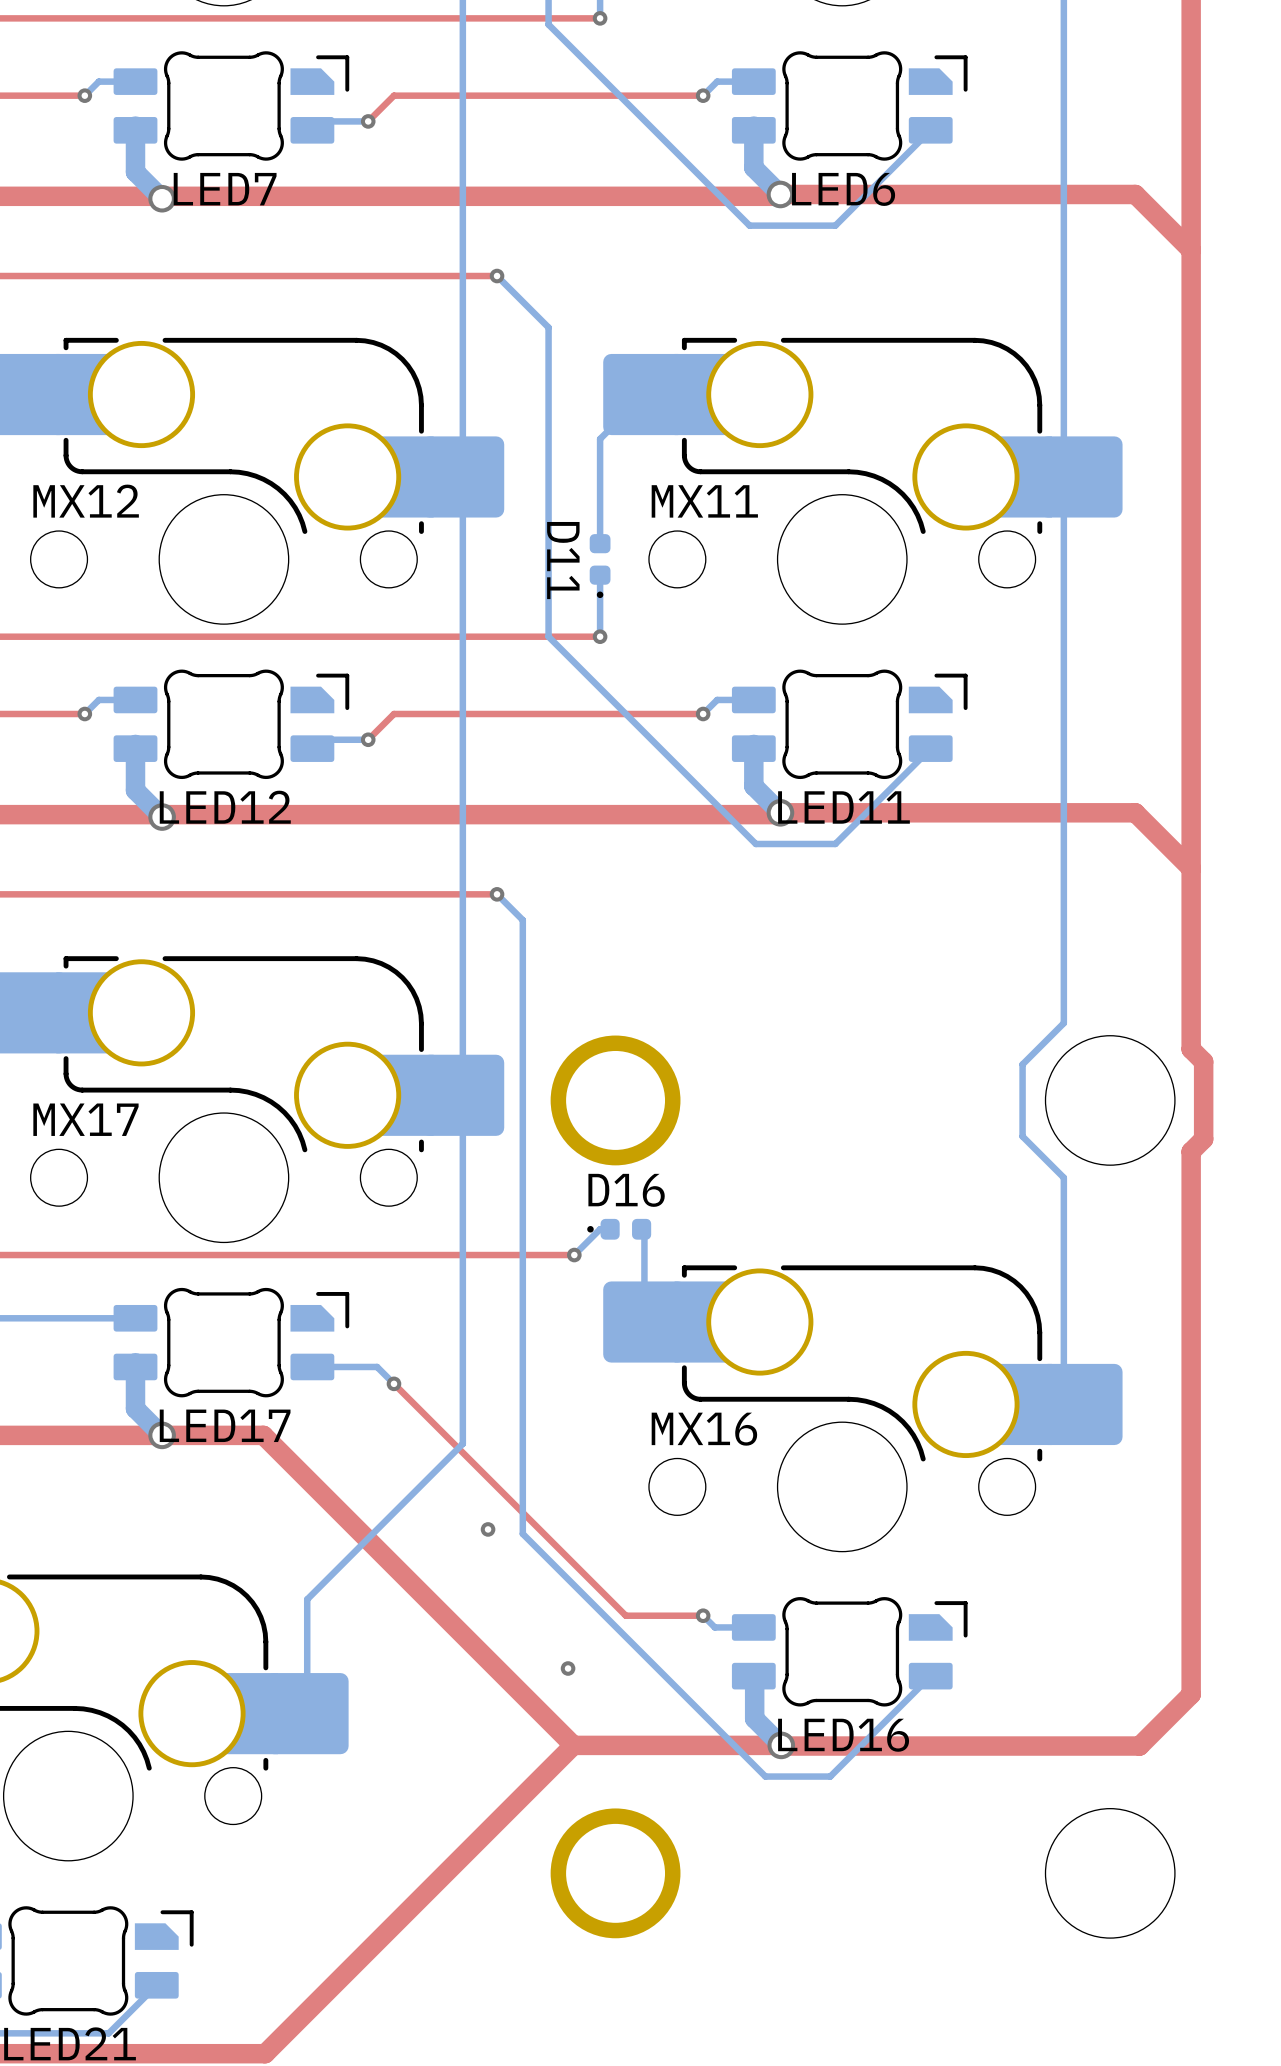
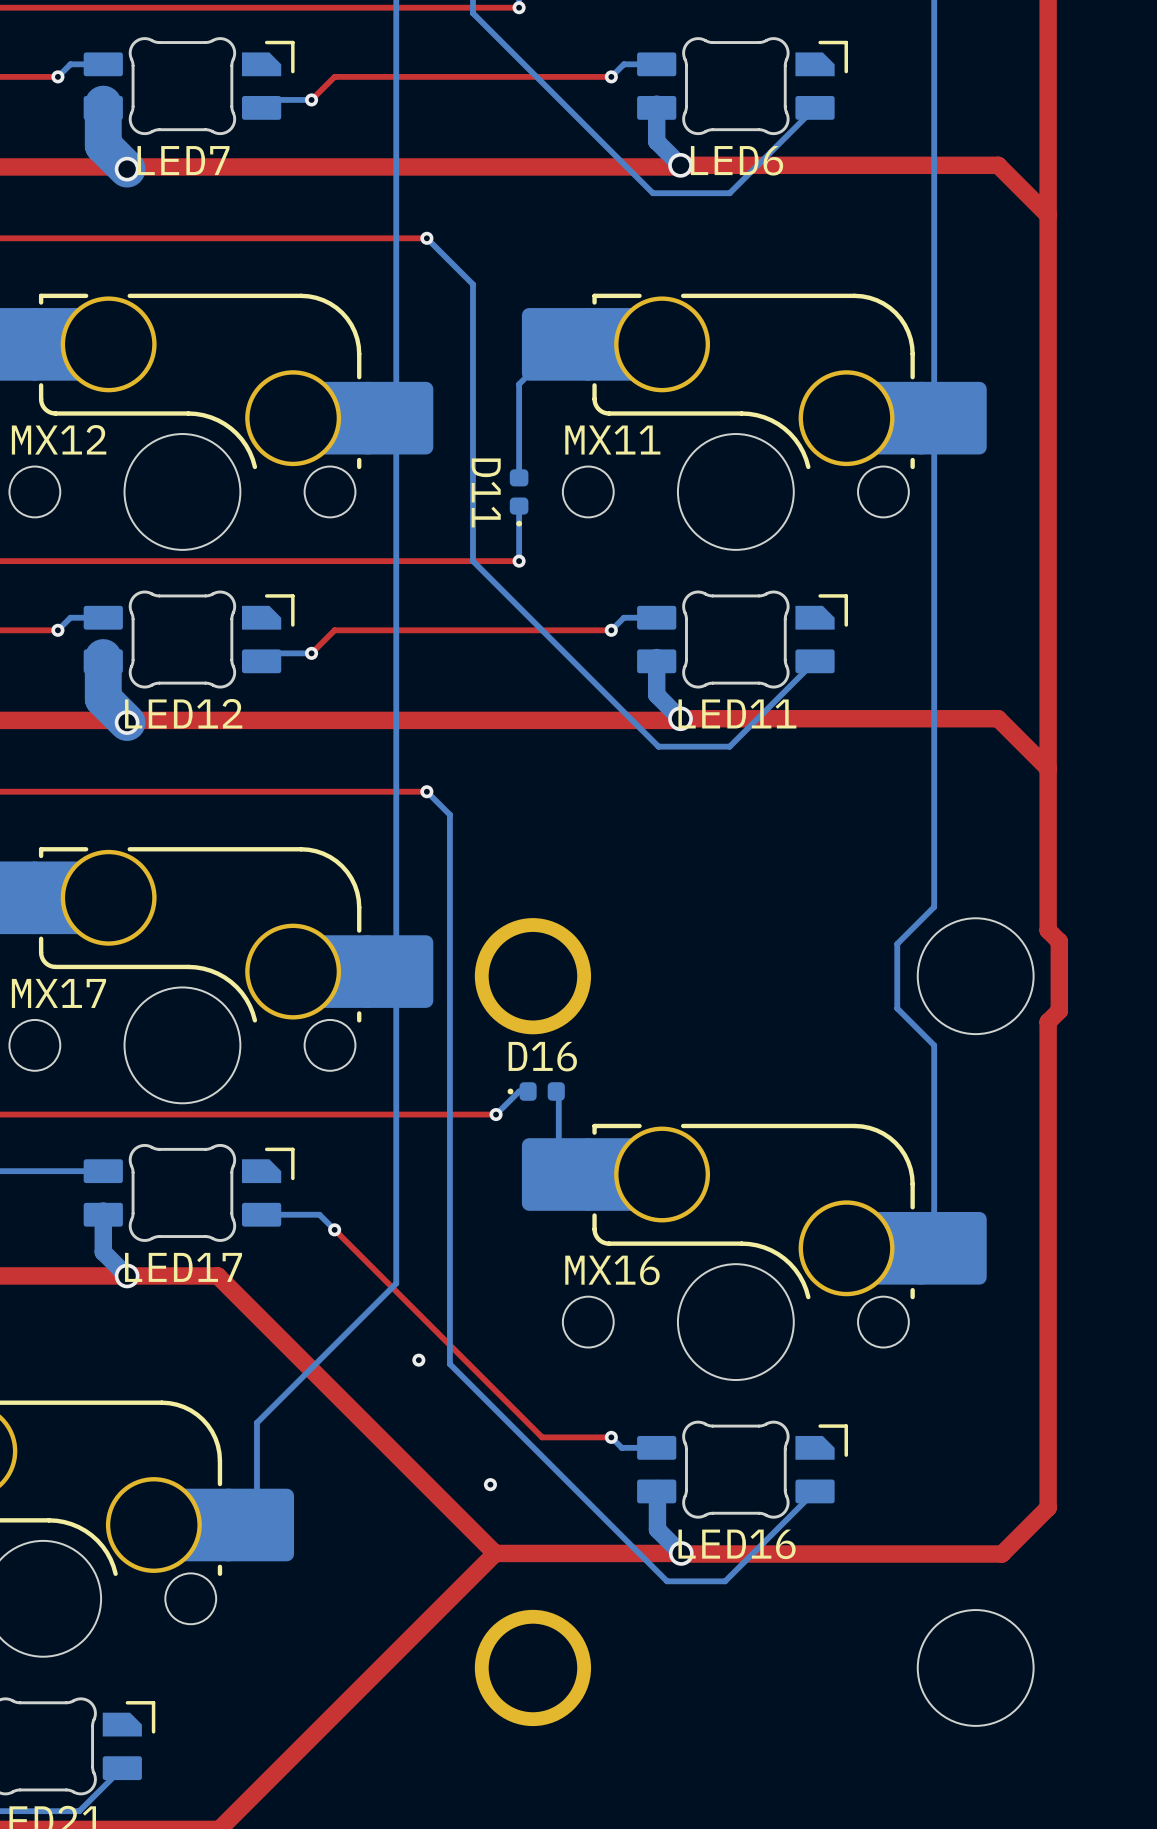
bottom track width: thin (135, 126) (135, 172) (162, 198) -> thick (103, 104) (103, 145) (127, 169)
bottom track width: thin (135, 744) (135, 790) (162, 817) -> thick (103, 657) (103, 698) (127, 722)

